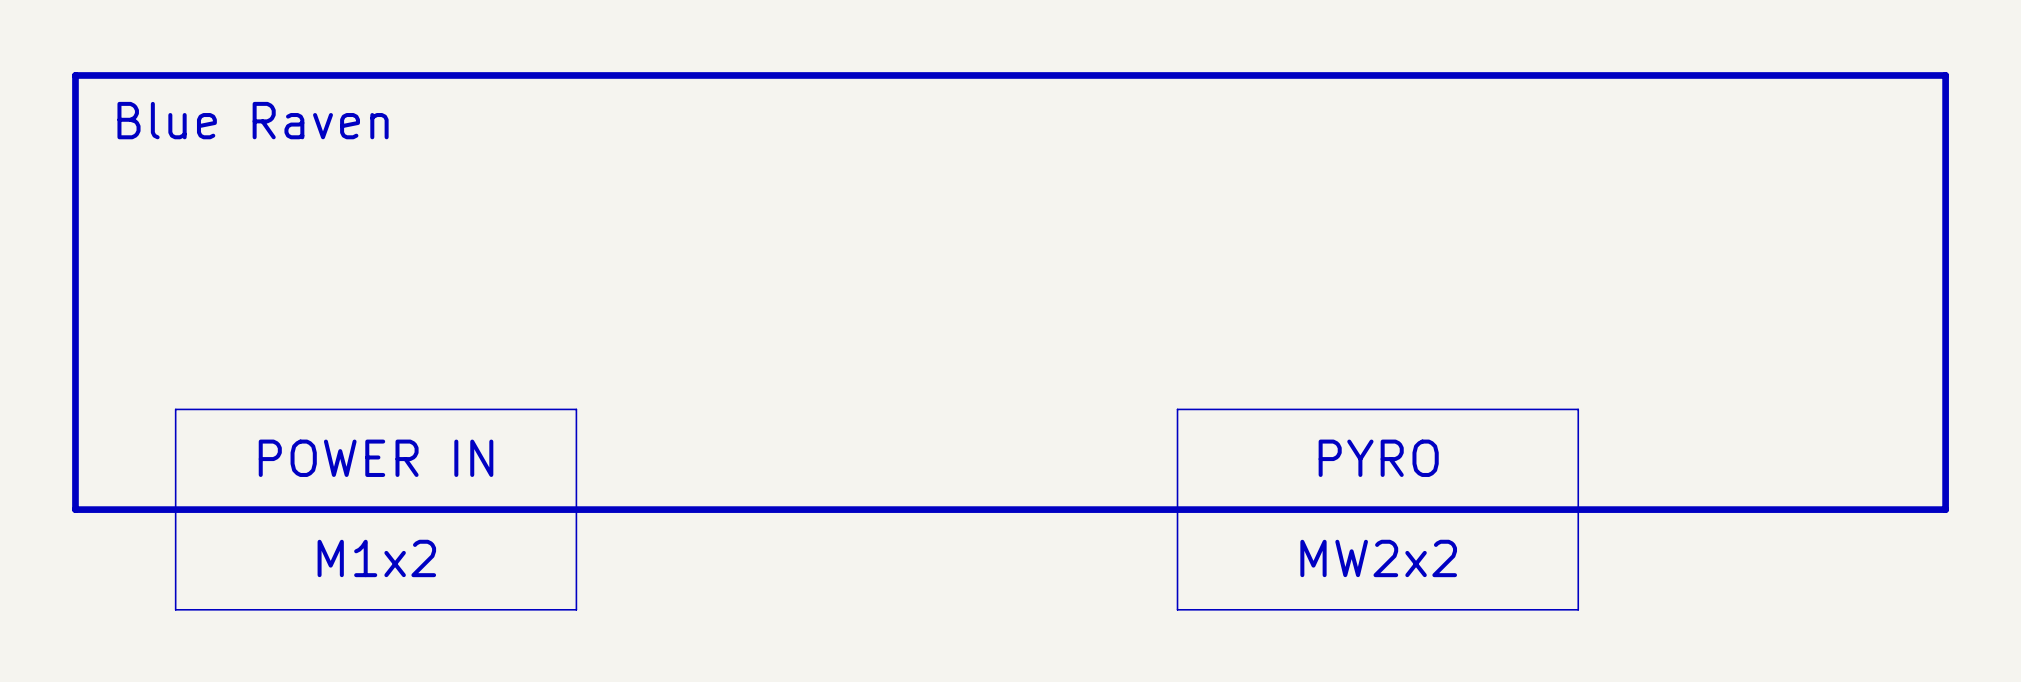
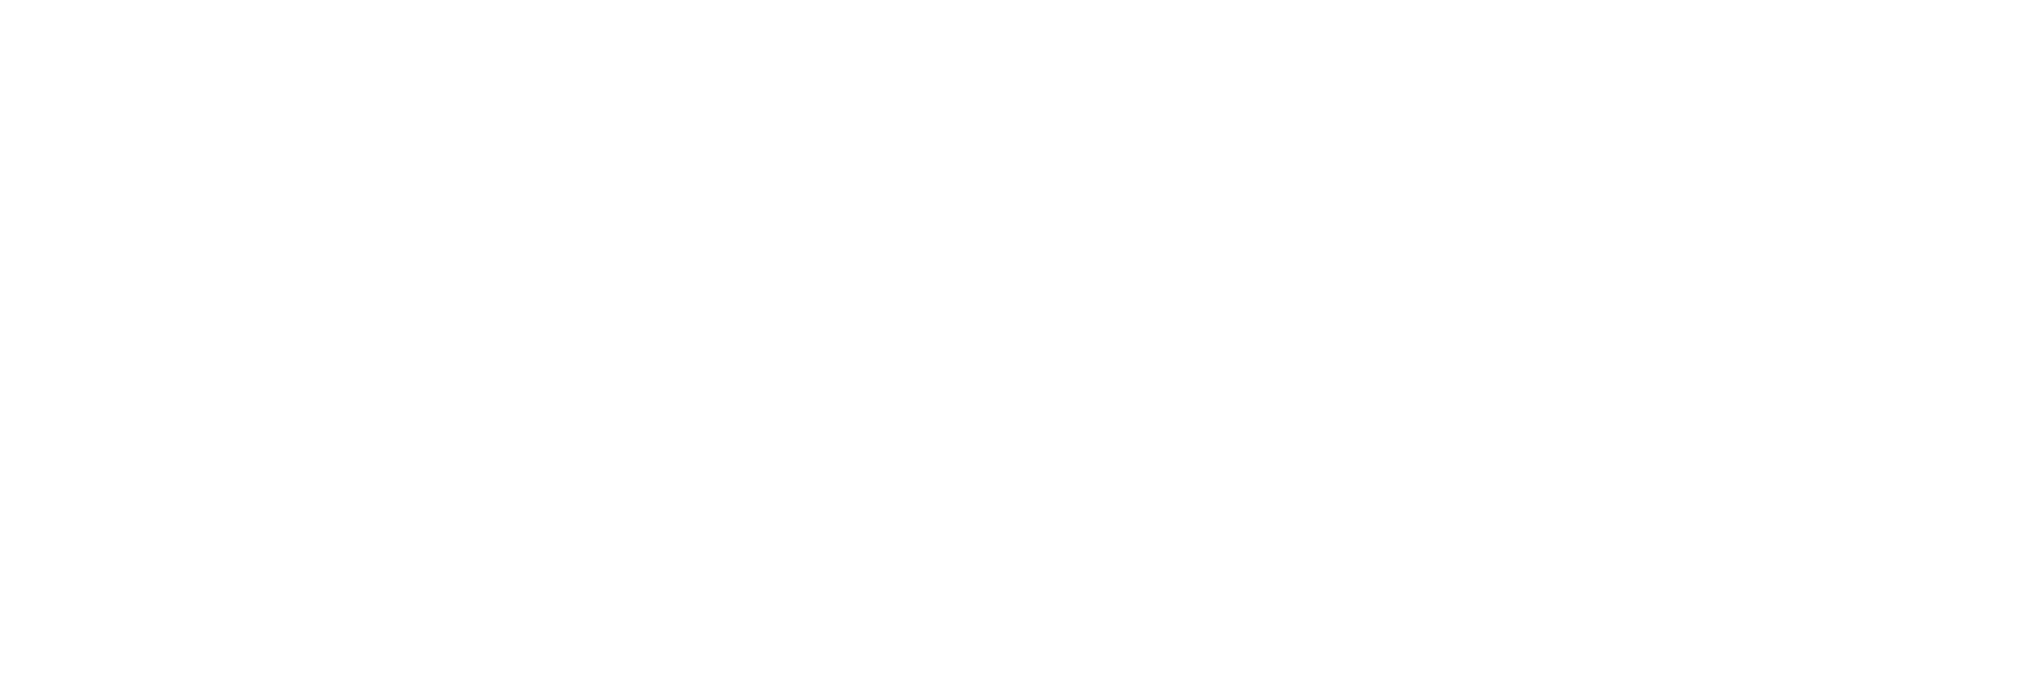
line: (75, 75) (1945, 75) (1945, 509) (75, 509) (75, 75) -> none
text: Blue Raven (253, 120) -> none
line: (175, 409) (576, 409) (576, 609) (175, 609) (175, 409) -> none
line: (1177, 409) (1578, 409) (1578, 609) (1177, 609) (1177, 409) -> none
text: POWER IN (376, 458) -> none
text: PYRO (1378, 458) -> none
text: M1x2 (376, 558) -> none
text: MW2x2 (1378, 558) -> none

